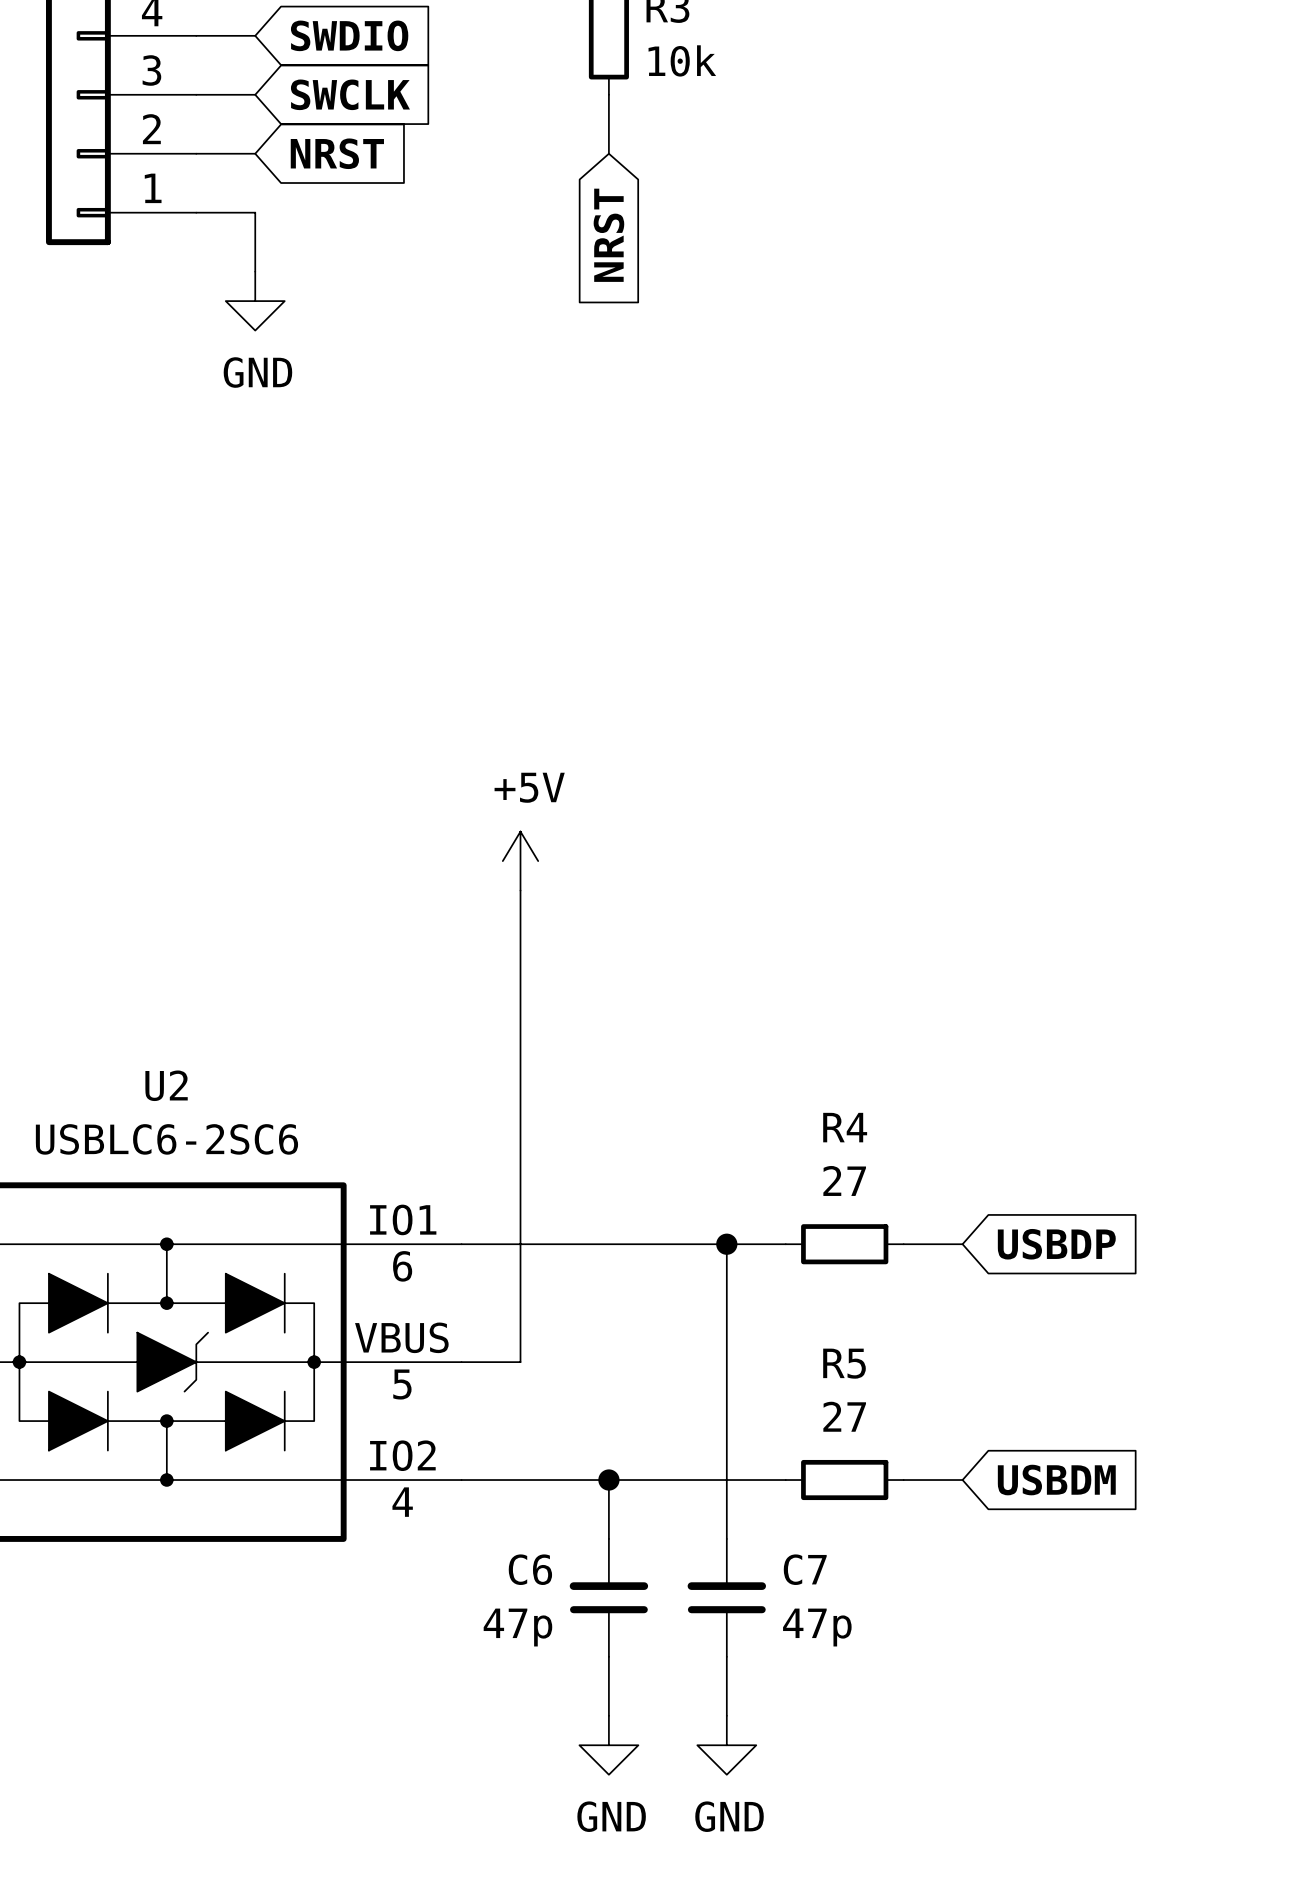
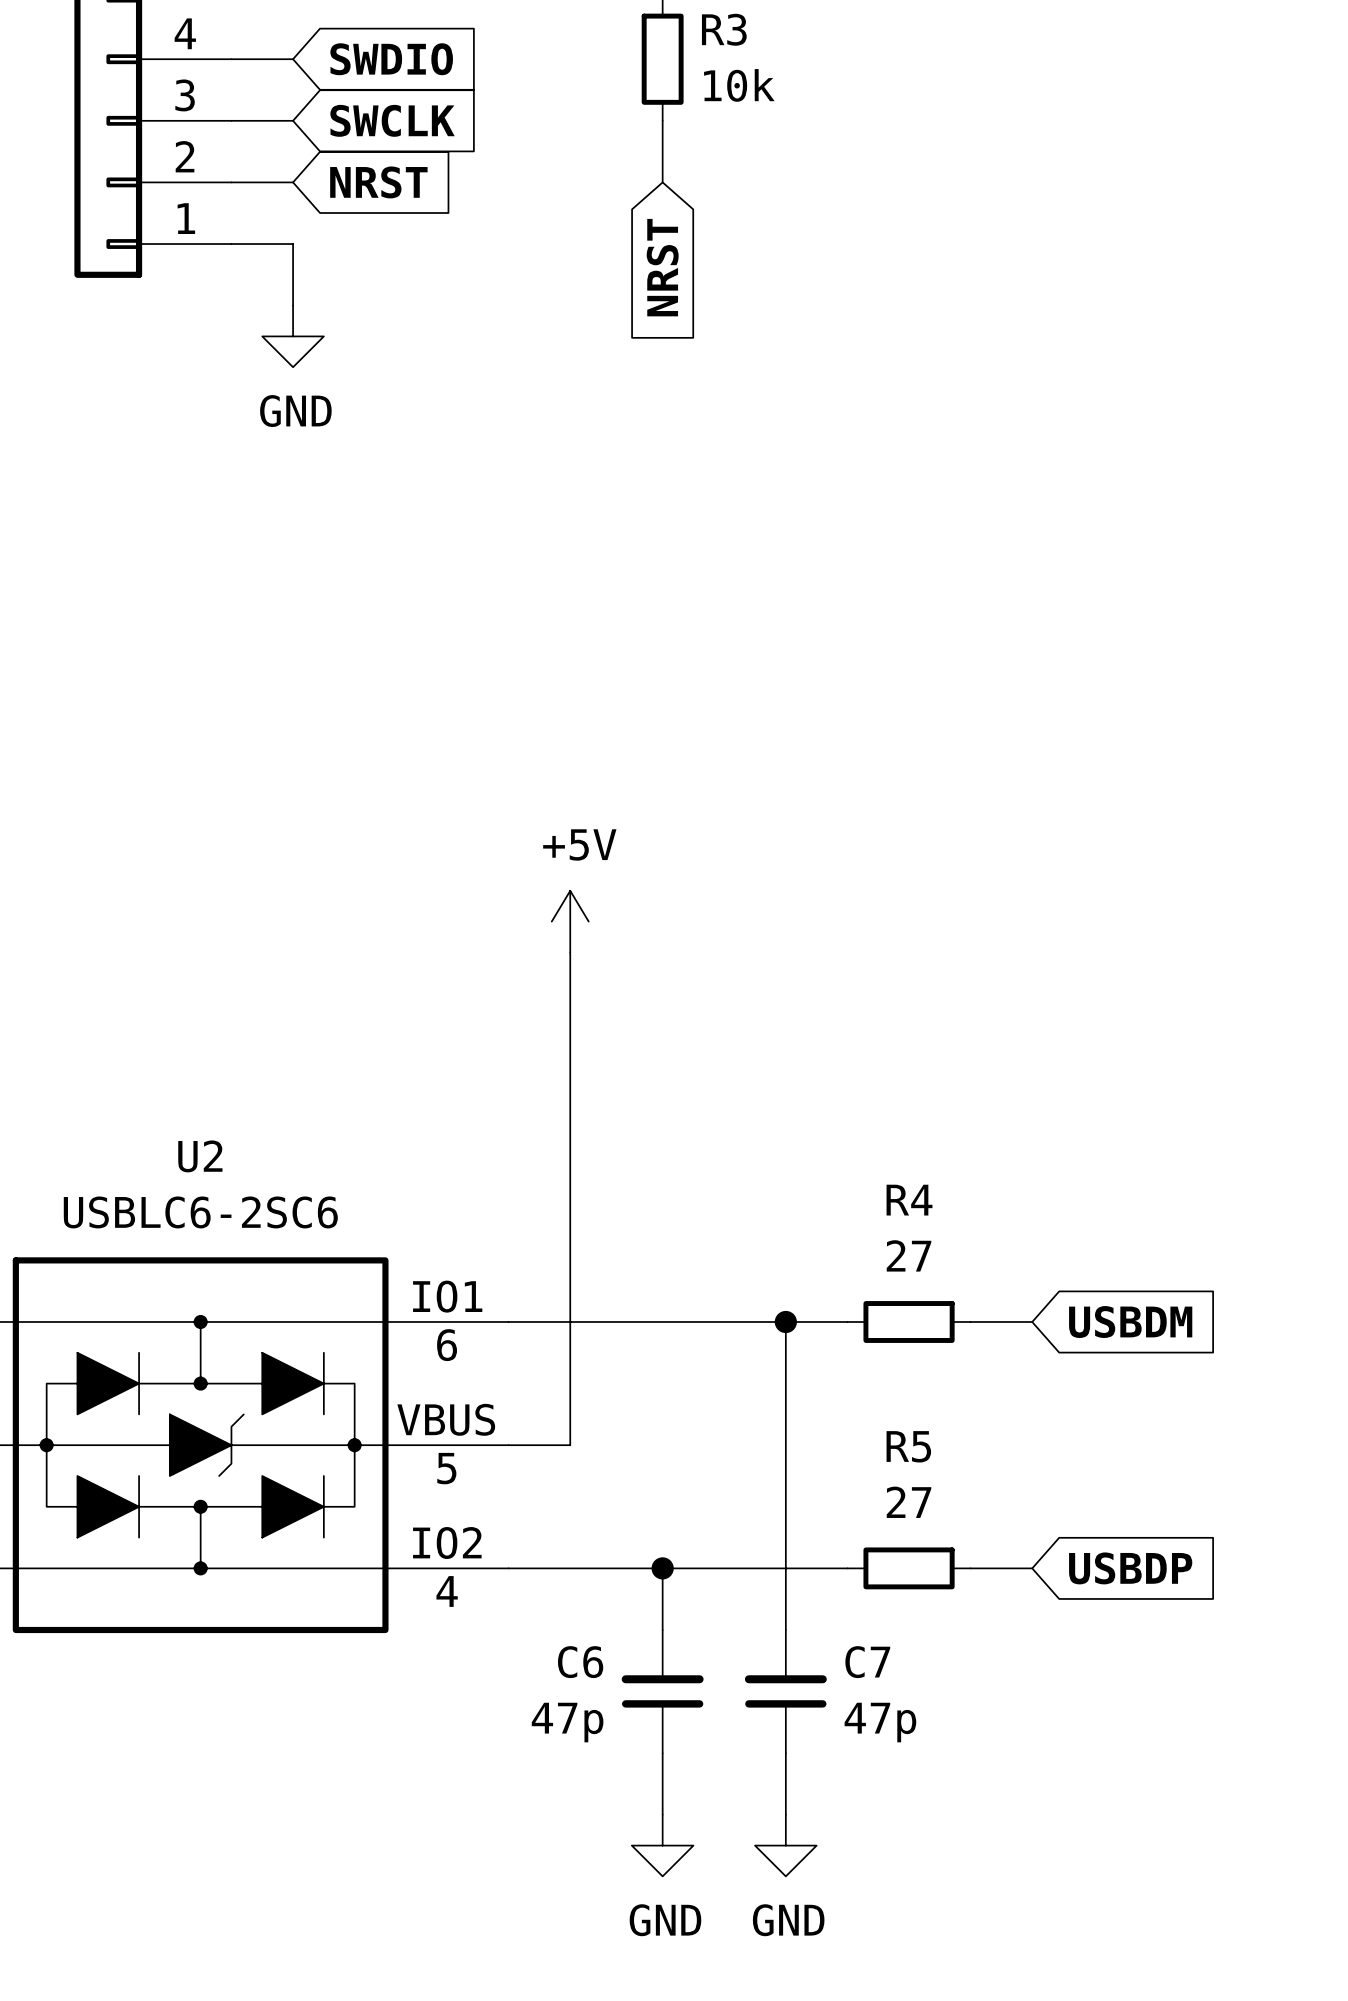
global label: USBDP (1056, 1244) -> USBDM (1130, 1322)
global label: USBDM (1056, 1480) -> USBDP (1130, 1568)

